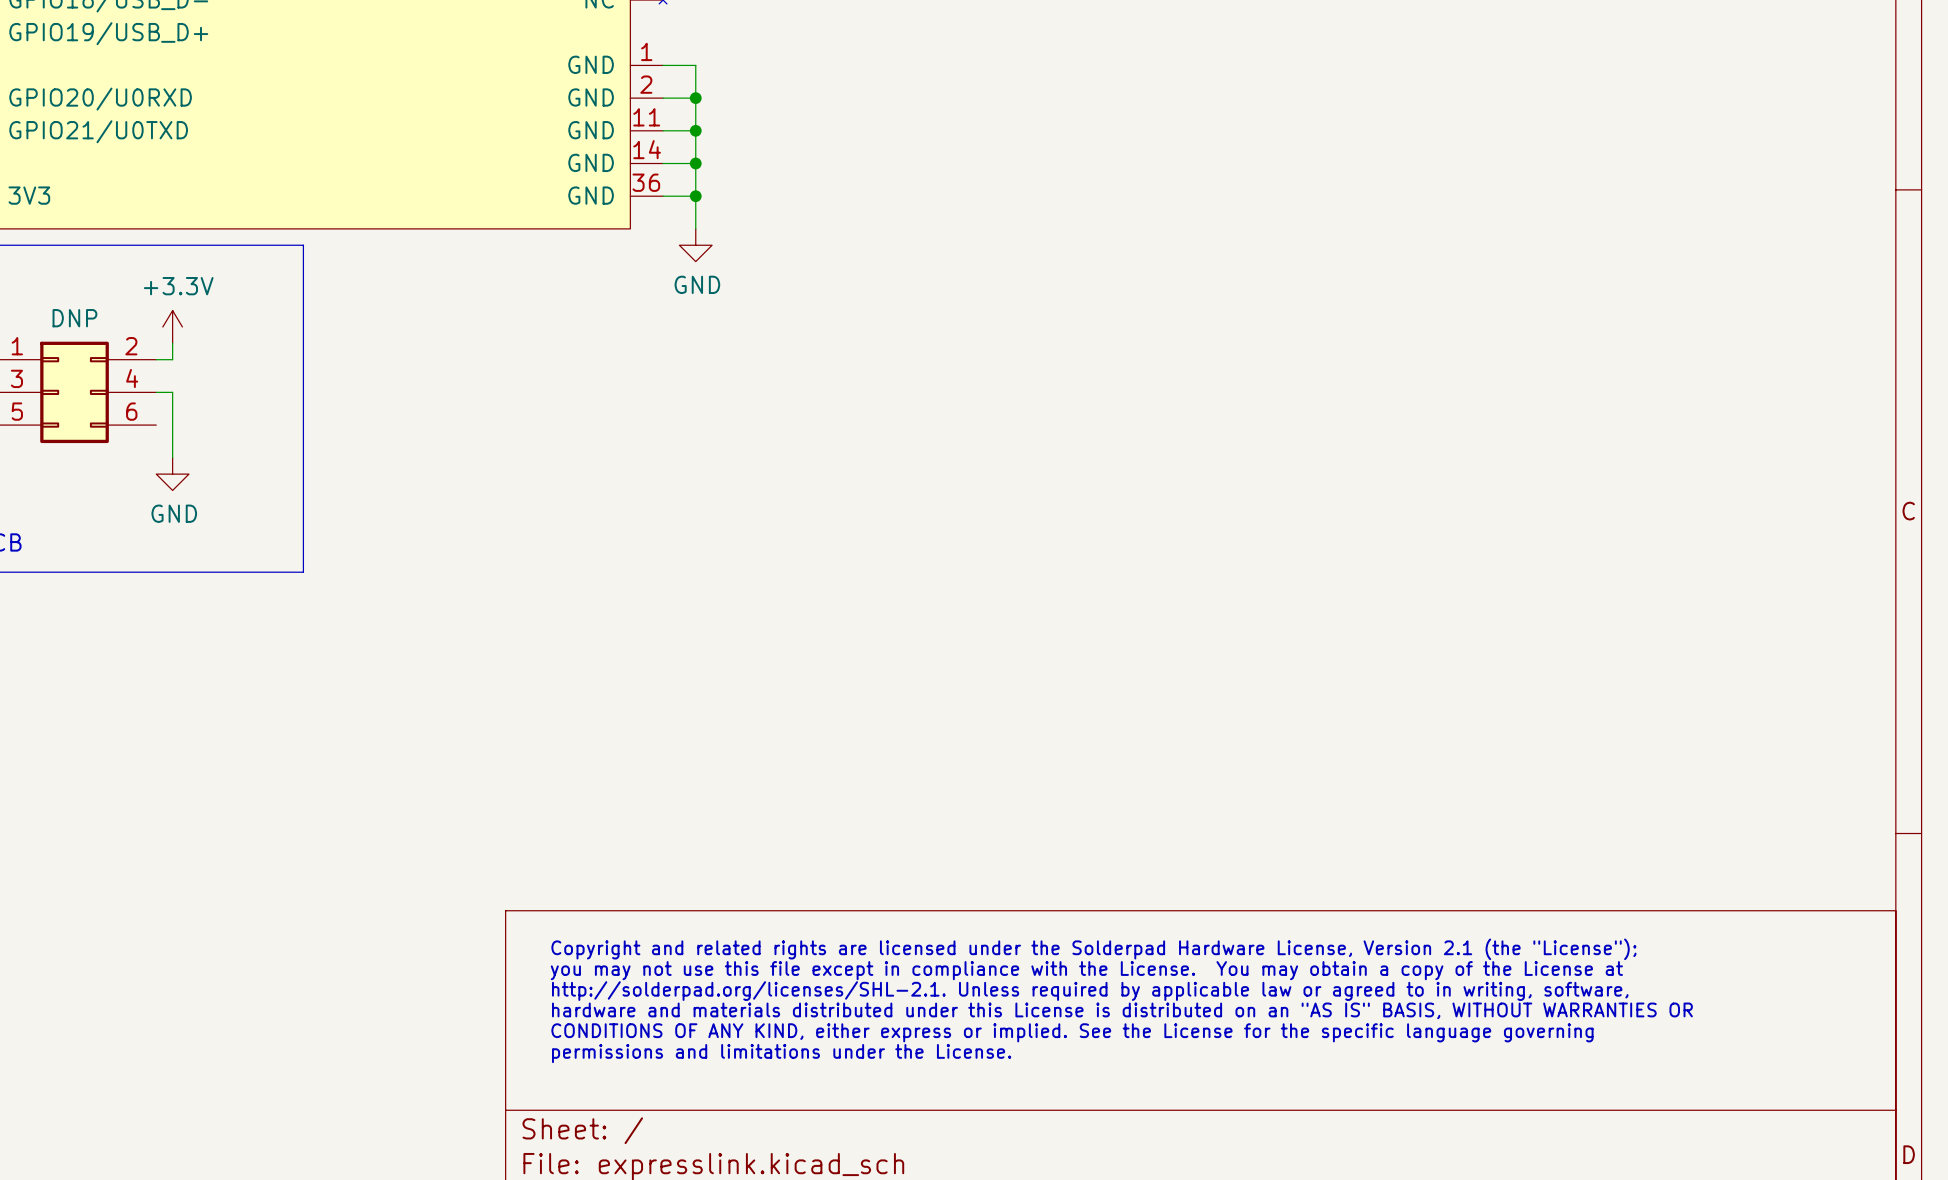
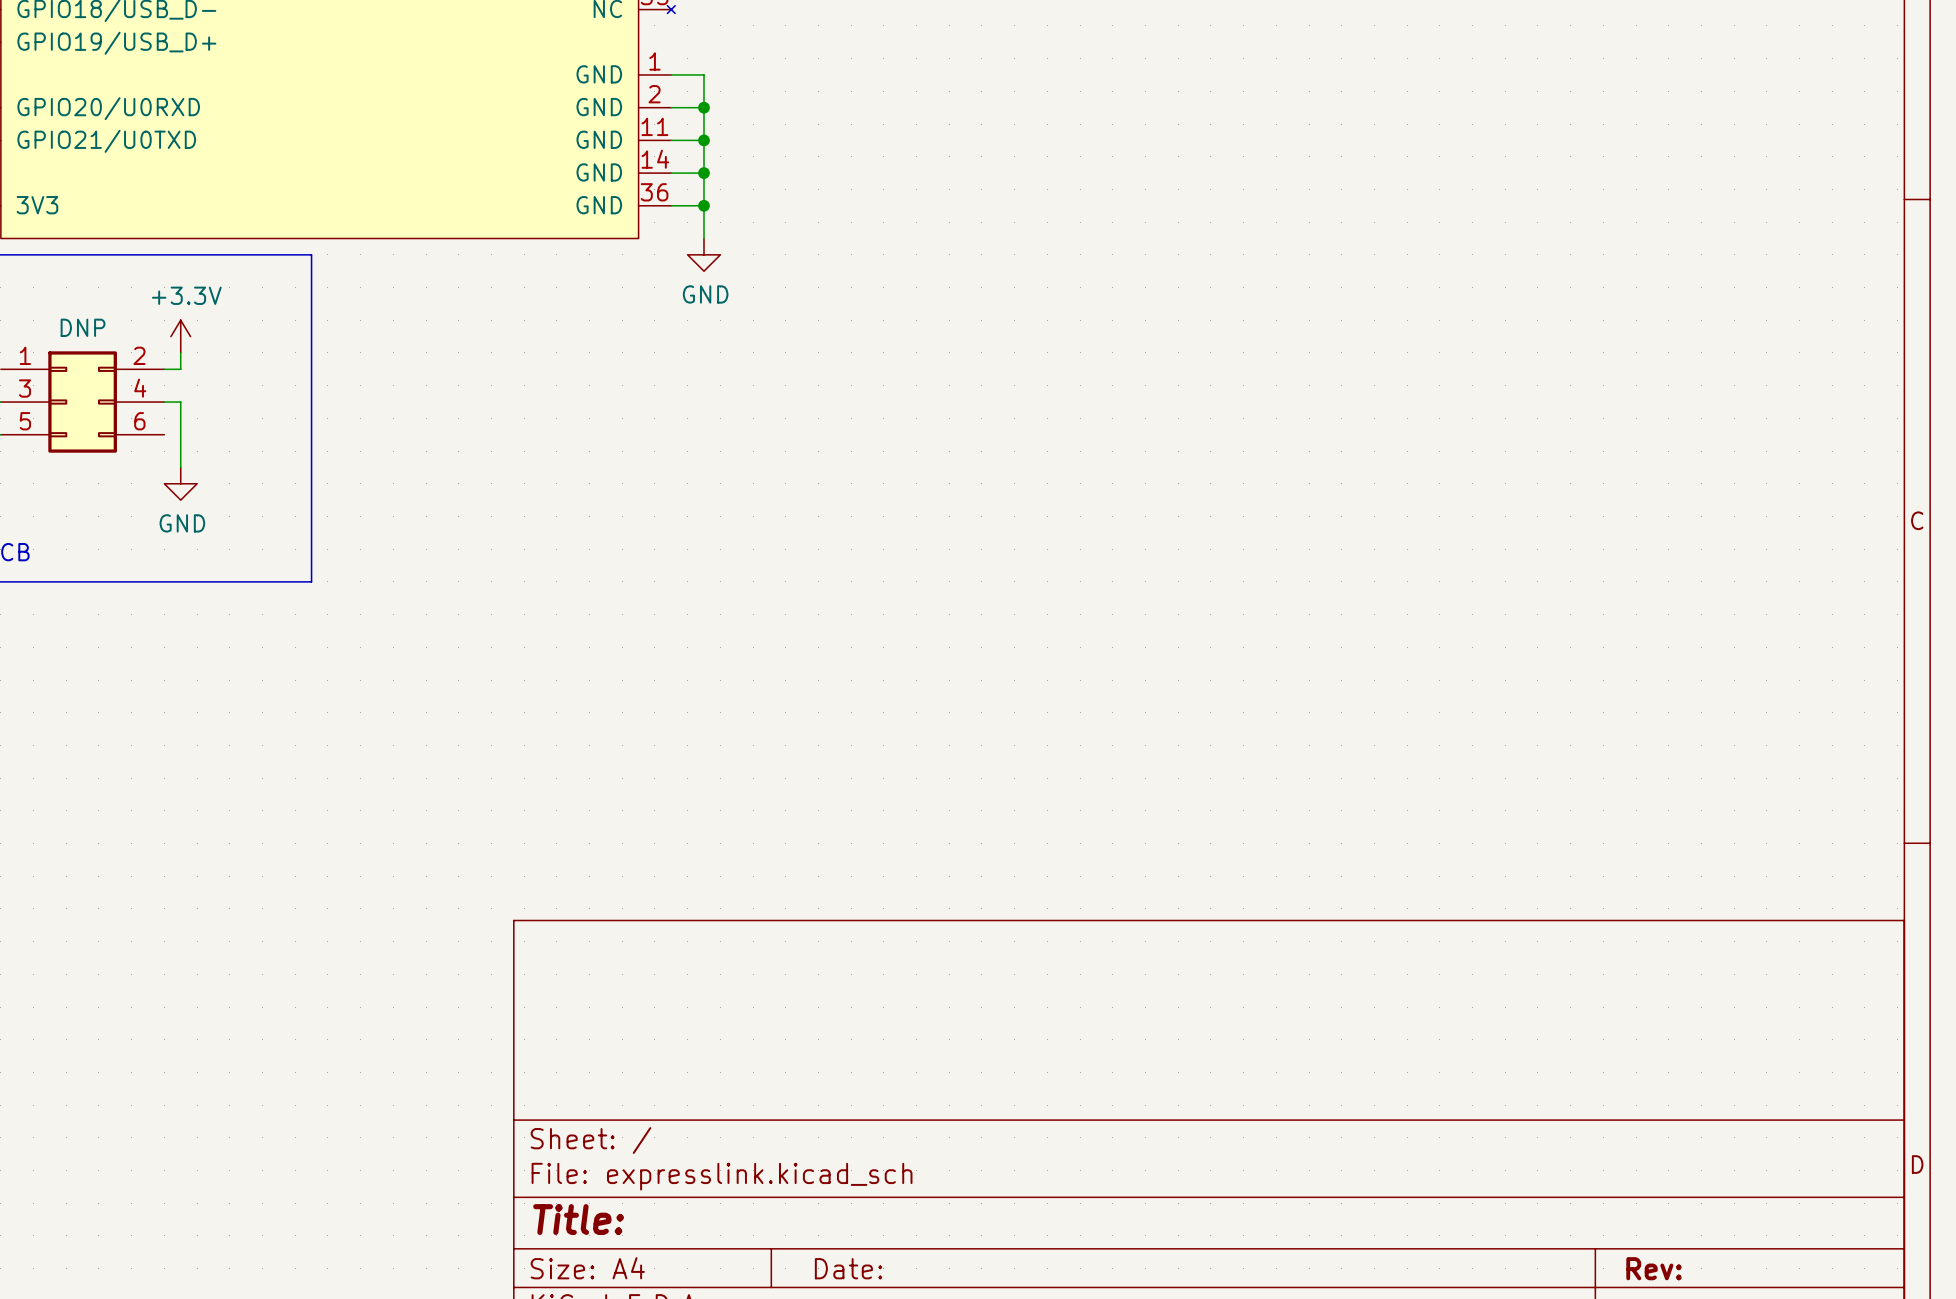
text: Copyright and related rights are licensed under the Solderpad Hardware License, Version 2.1 (the "License"); (1093, 949) -> none
text: you may not use this file except in compliance with the License. You may obtain a copy of the License at (1086, 970) -> none
text: http://solderpad.org/licenses/SHL-2.1. Unless required by applicable law or agreed to in writing, software, (1090, 991) -> none
text: hardware and materials distributed under this License is distributed on an "AS IS" BASIS, WITHOUT WARRANTIES OR (1122, 1010) -> none
text: CONDITIONS OF ANY KIND, either express or implied. See the License for the specific language governing (1072, 1032) -> none
text: permissions and limitations under the License. (781, 1053) -> none

